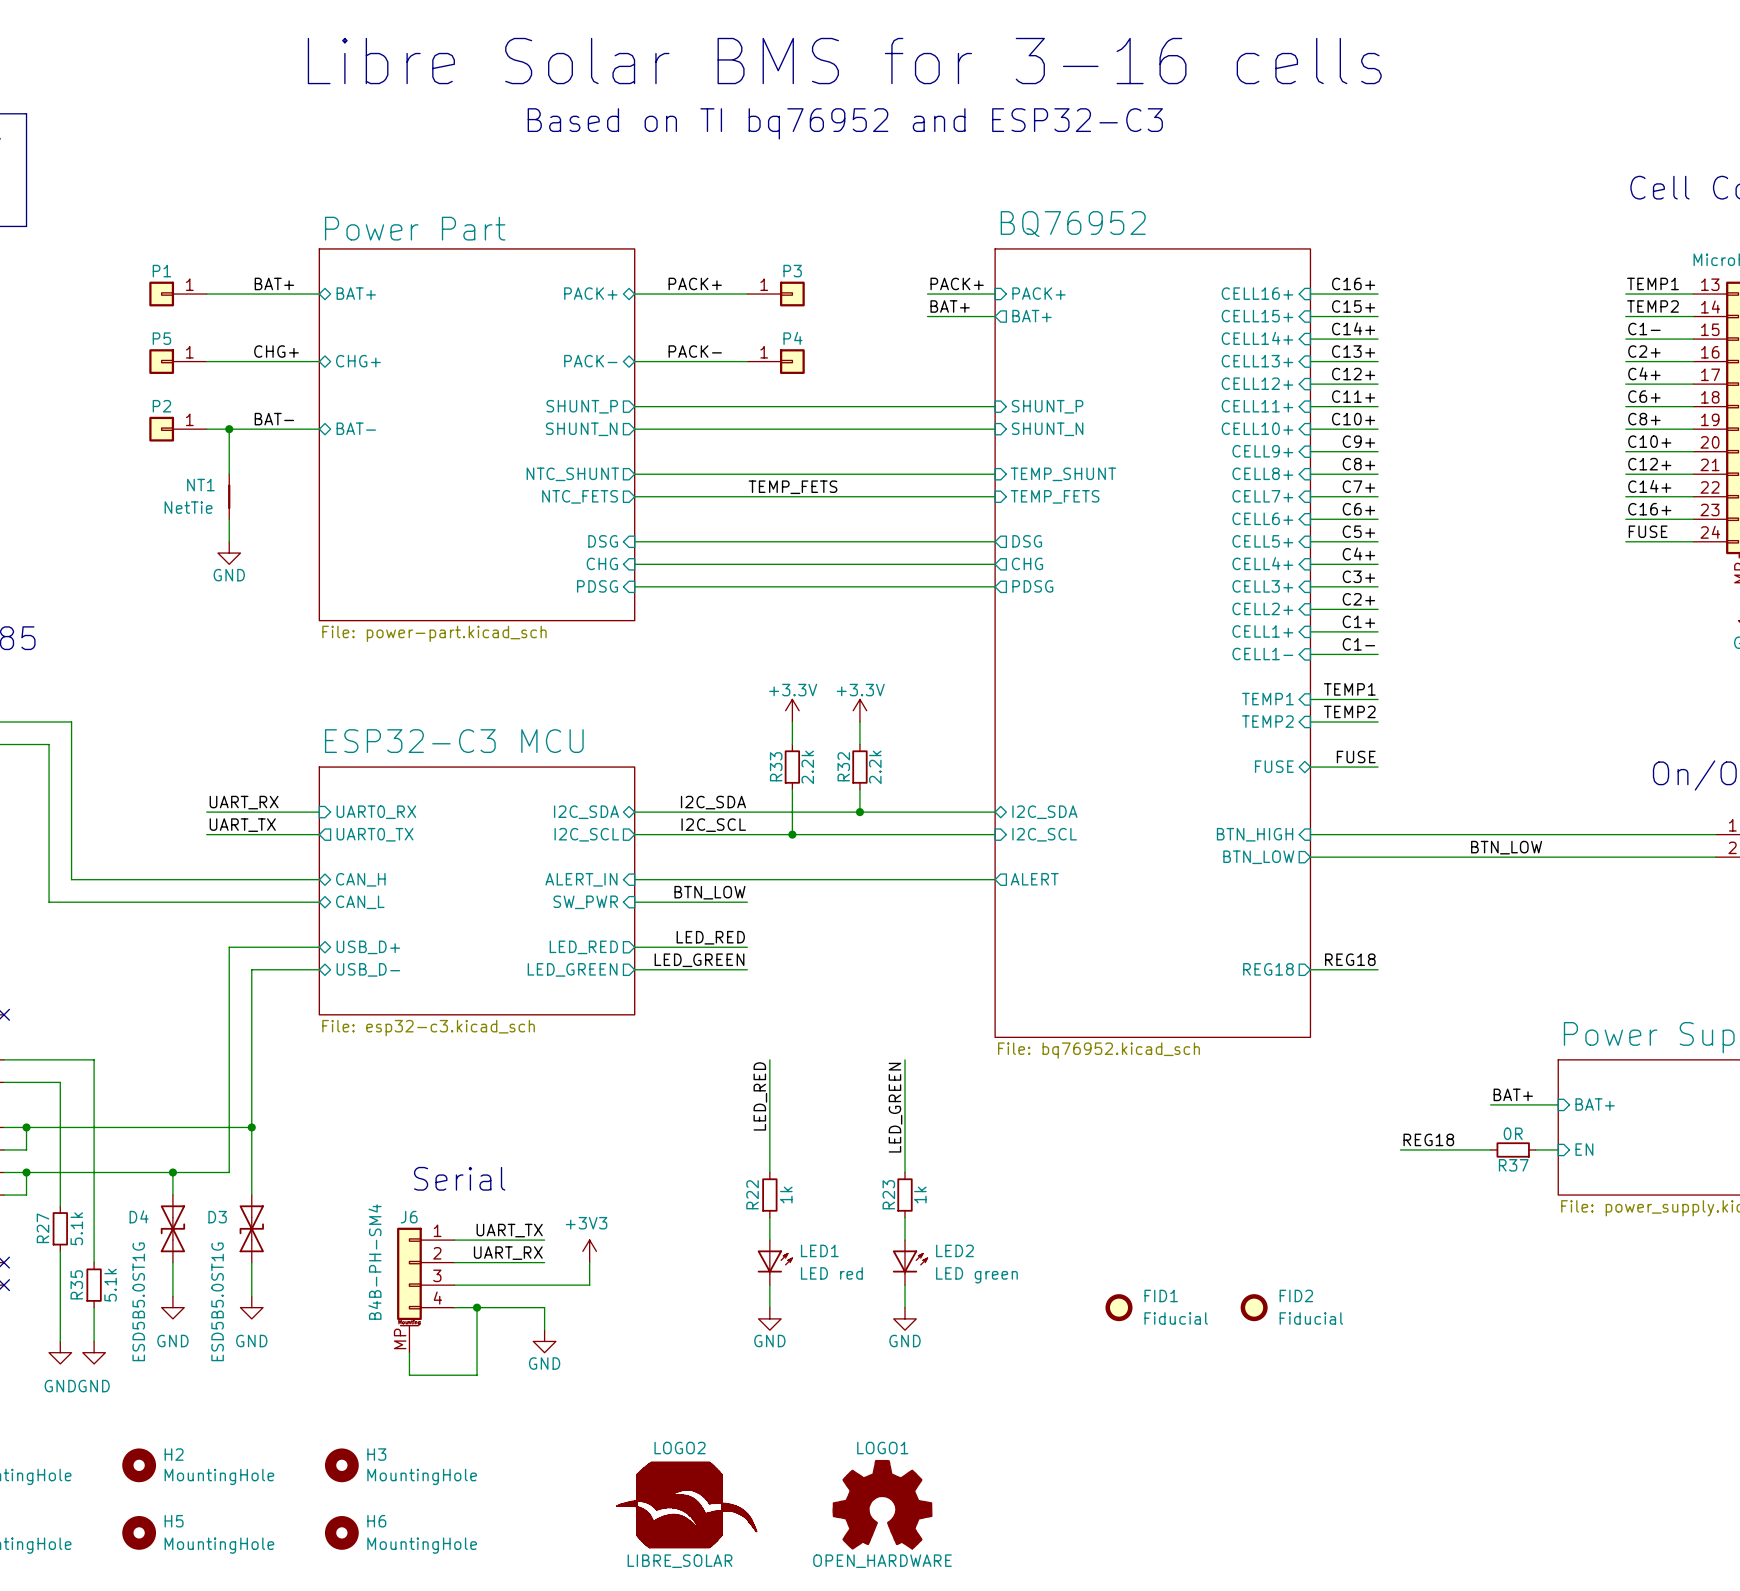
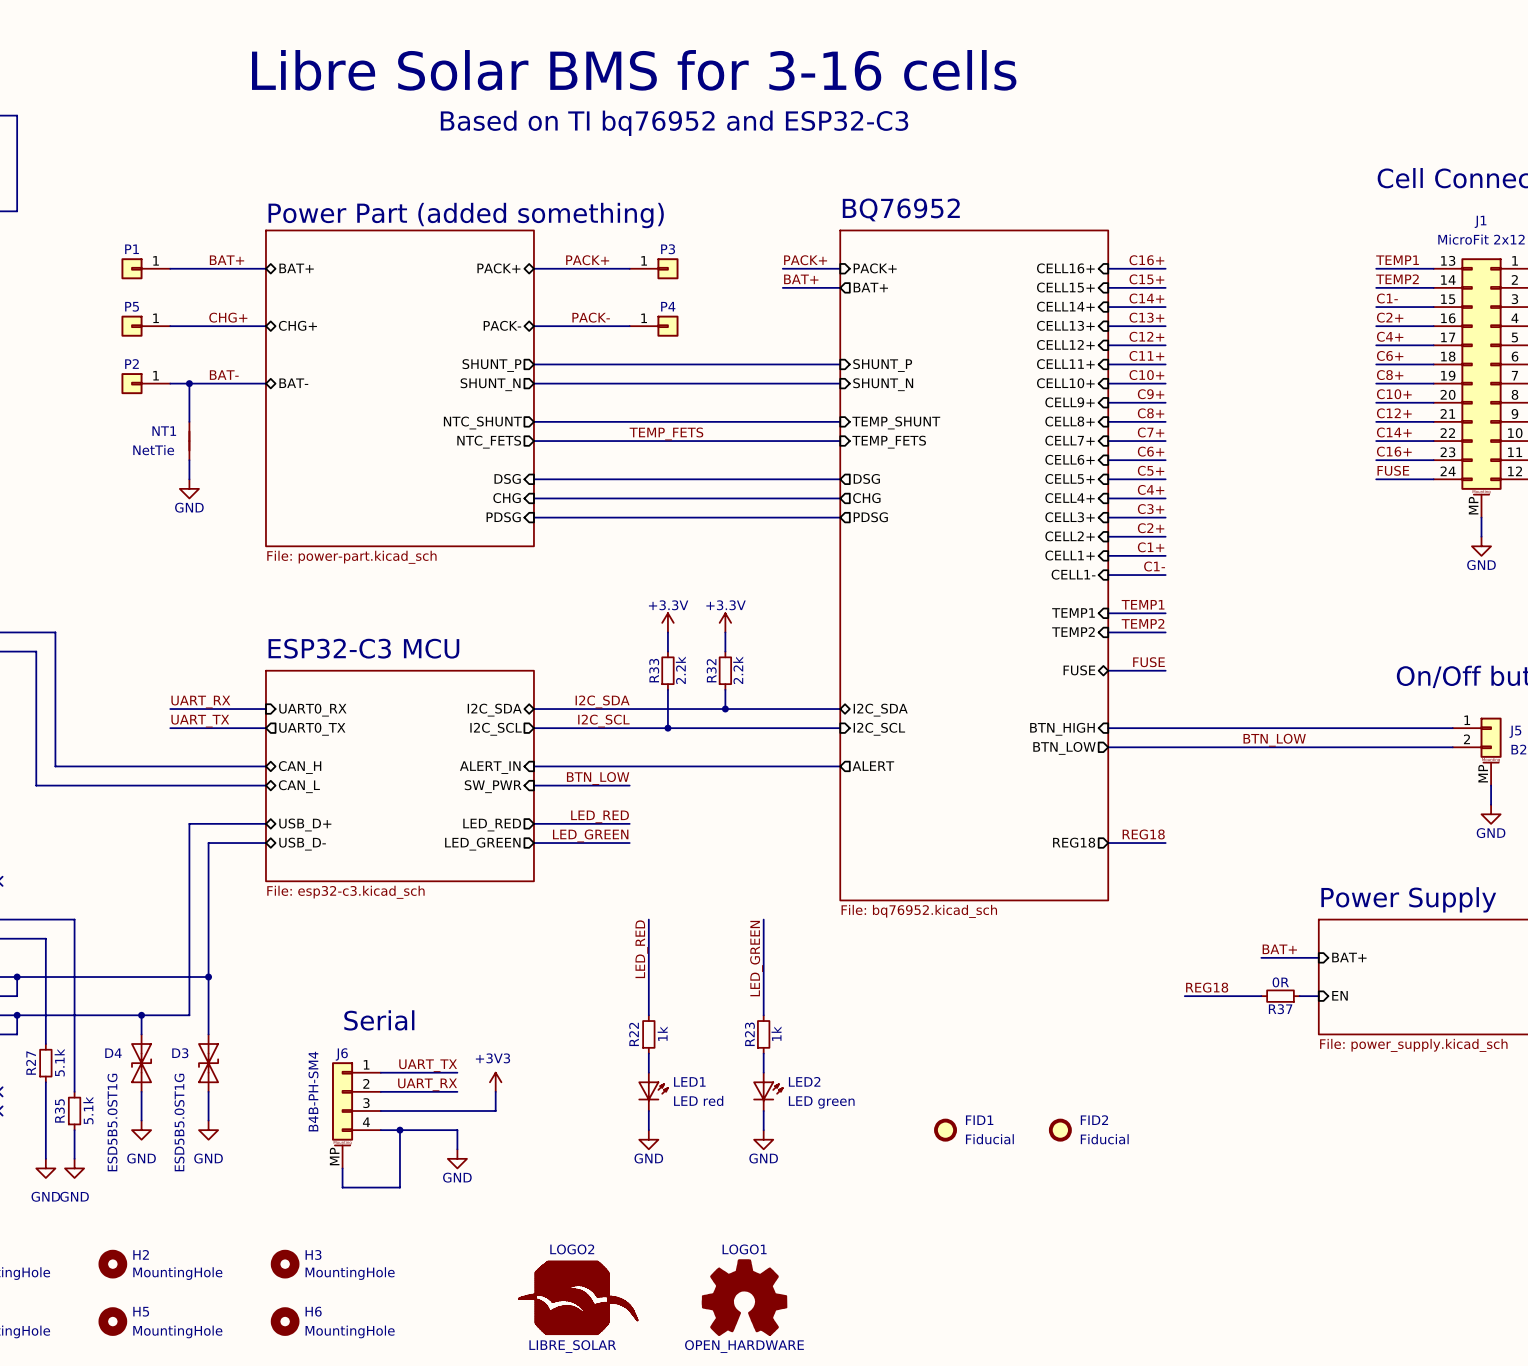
sheet Power Part name: Power Part (415, 228) -> Power Part (added something) (466, 215)

